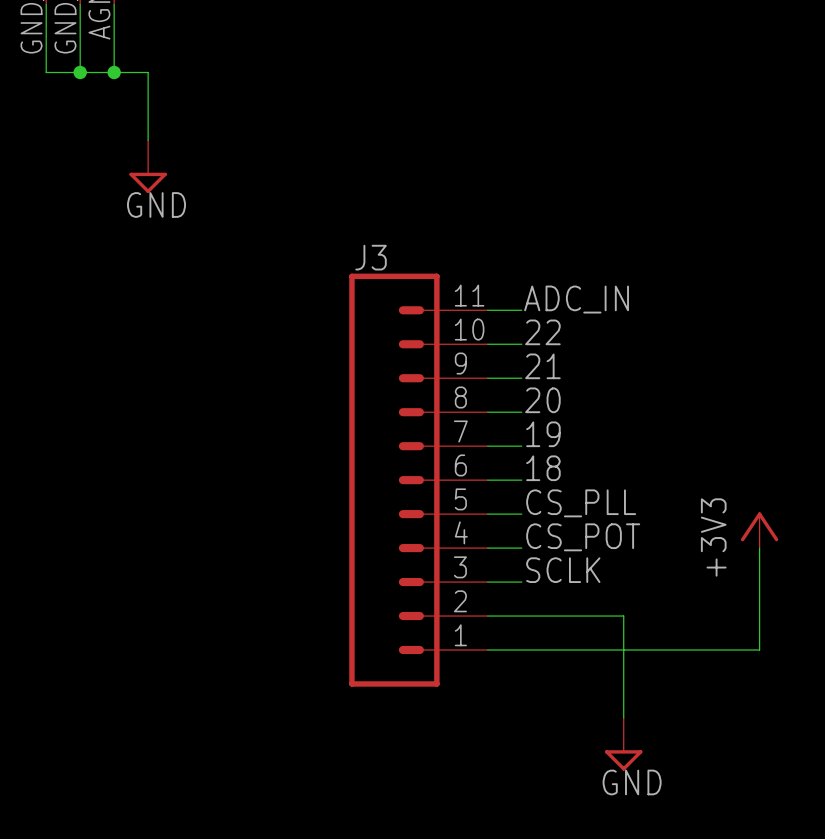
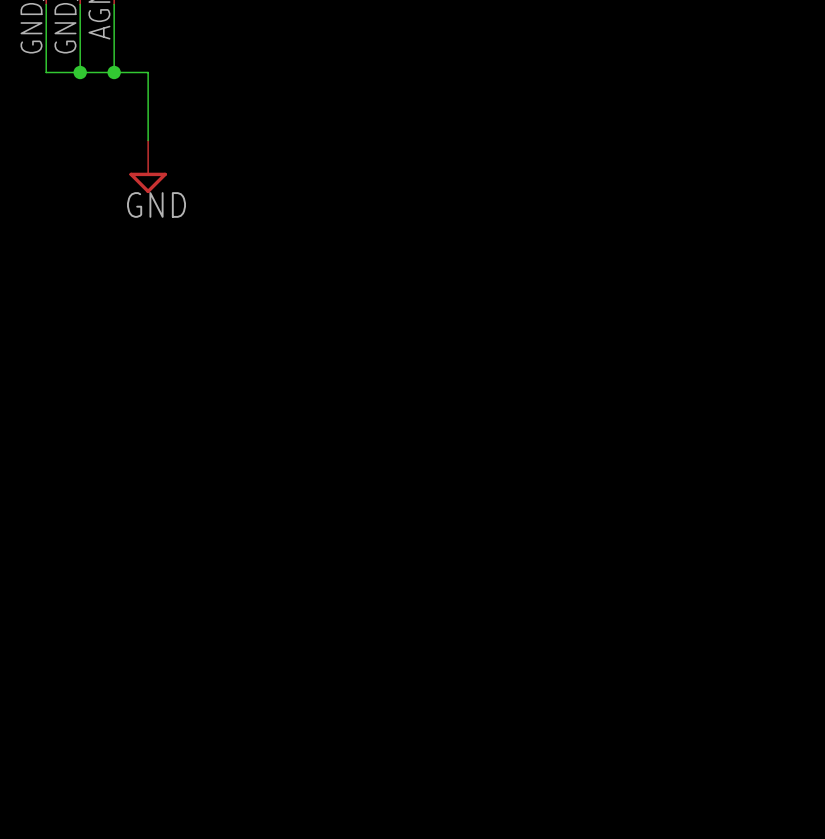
label: ADC_IN (576, 299) -> none
wire: (487, 310) (521, 310) -> none
label: 22 (542, 332) -> none
wire: (487, 344) (521, 344) -> none
label: 21 (542, 366) -> none
wire: (487, 378) (521, 378) -> none
label: 20 (542, 400) -> none
wire: (487, 412) (521, 412) -> none
label: 19 (543, 434) -> none
wire: (487, 446) (521, 446) -> none
label: 18 (543, 468) -> none
J3: (418, 480) -> none
wire: (487, 480) (521, 480) -> none
label: CS_PLL (581, 503) -> none
wire: (487, 514) (521, 514) -> none
power symbol: +3V3 (759, 530) -> none
label: CS_POT (583, 537) -> none
wire: (487, 548) (521, 548) -> none
wire: (759, 548) (759, 649) (487, 649) -> none
label: SCLK (563, 570) -> none
wire: (487, 582) (521, 582) -> none
wire: (487, 616) (623, 616) (623, 717) -> none
power symbol: GND (623, 744) -> none

